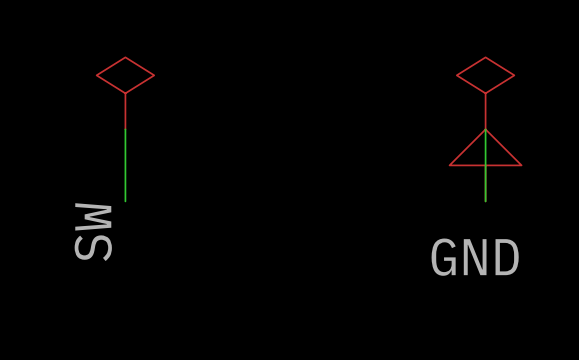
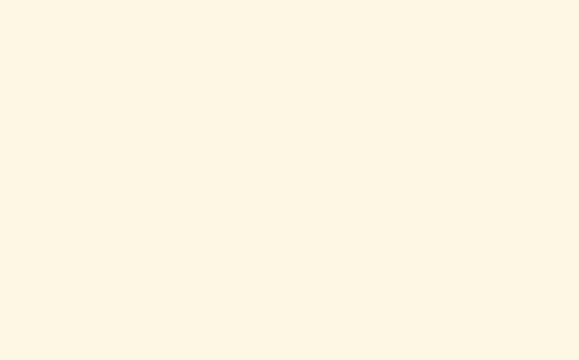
power symbol: (125, 93) -> none
power symbol: (485, 93) -> none
wire: (125, 129) (125, 201) -> none
wire: (485, 129) (485, 201) -> none
power symbol: GND (485, 165) -> none
label: SW (93, 232) -> none

